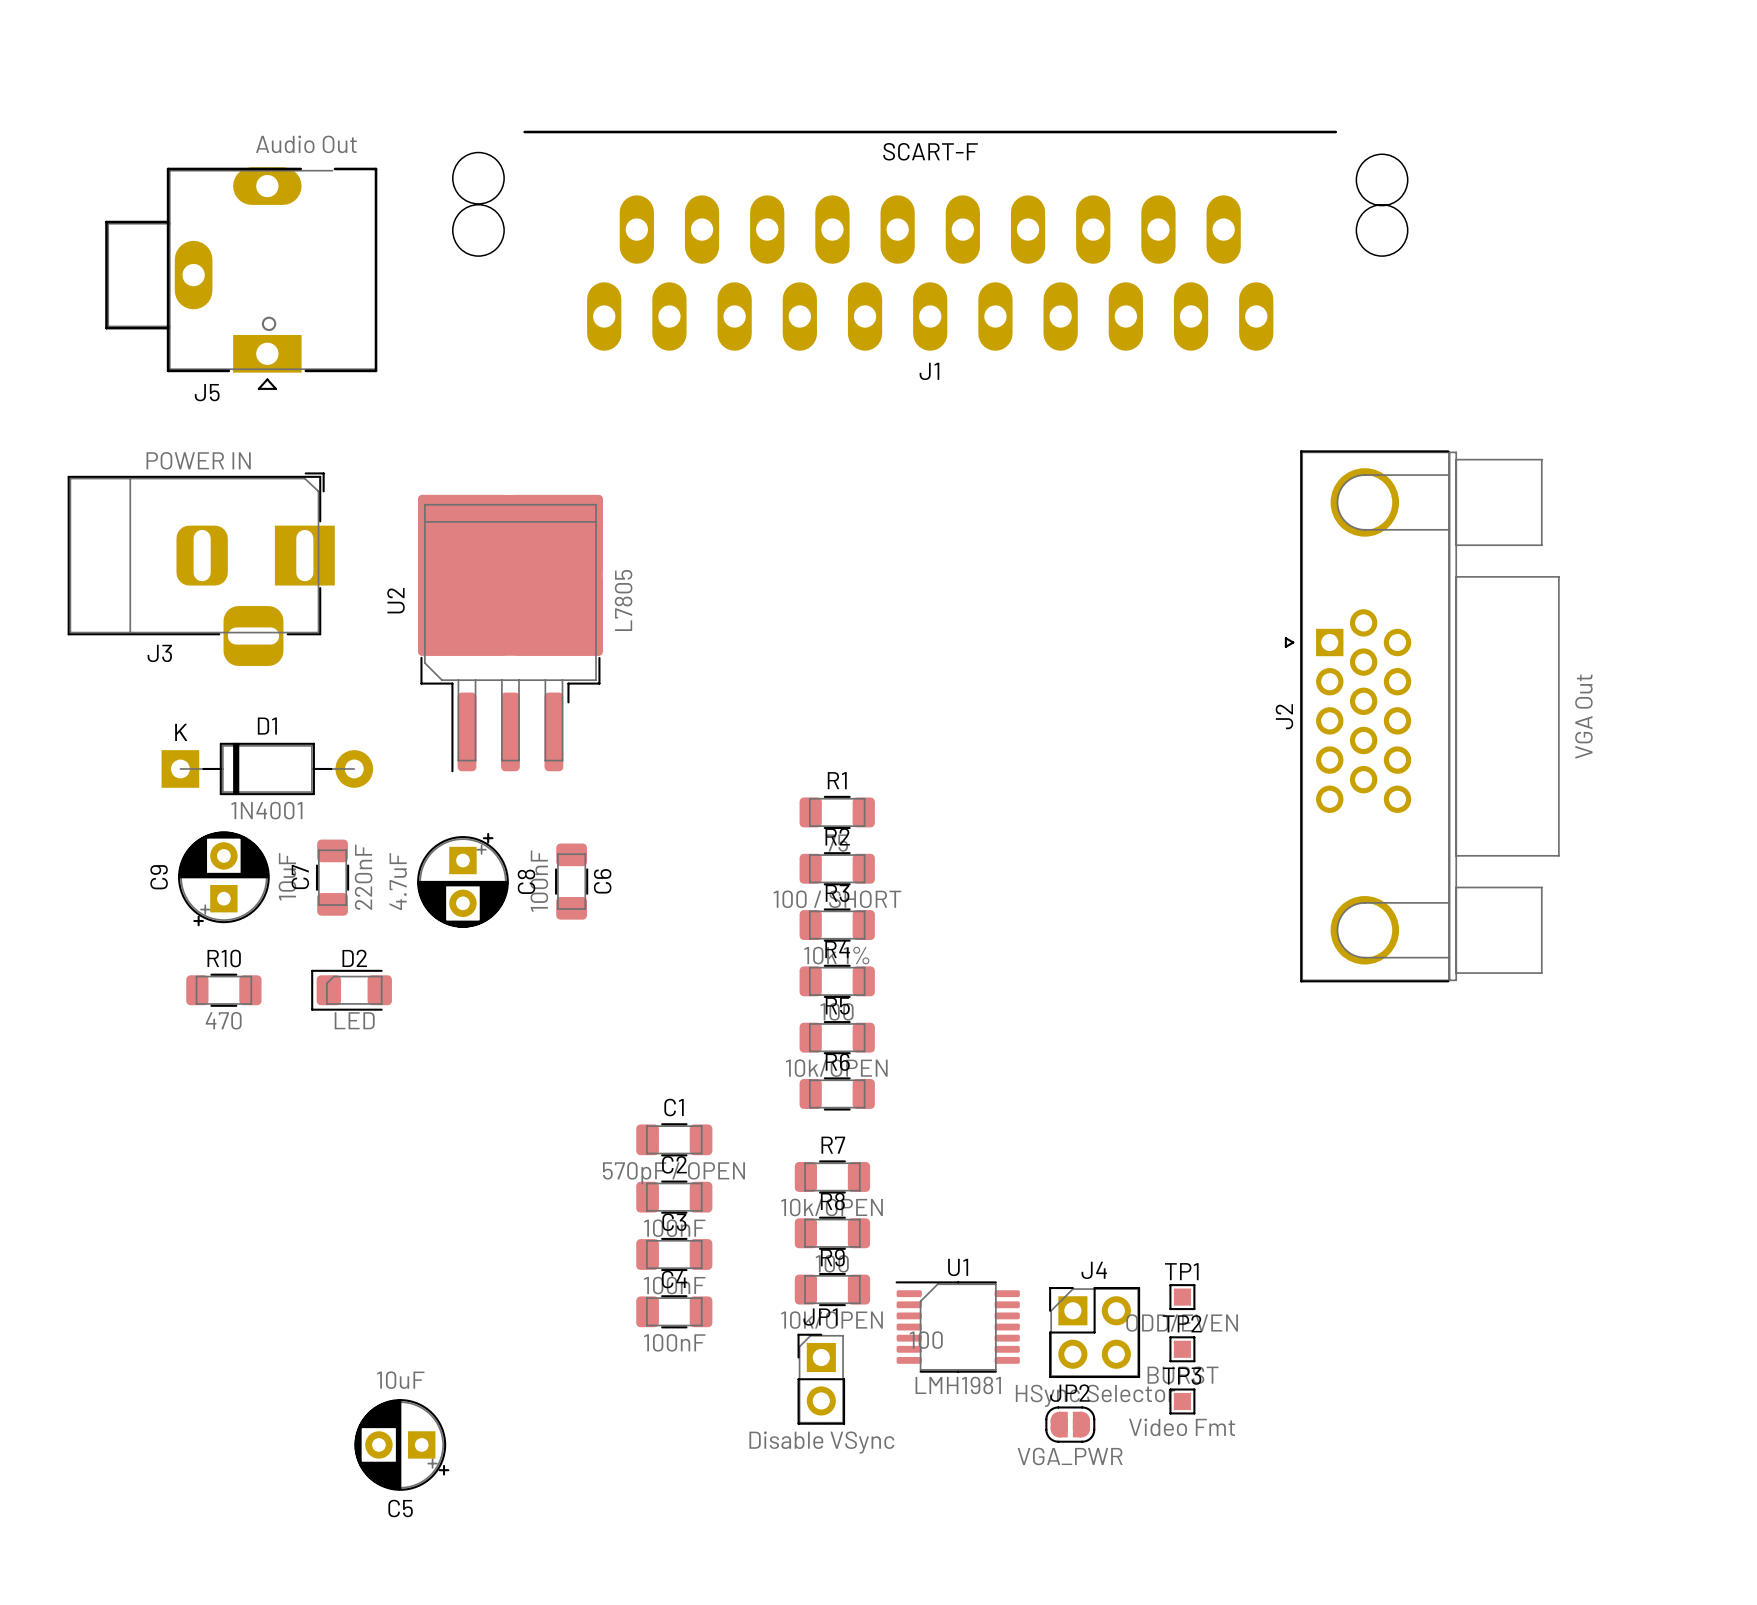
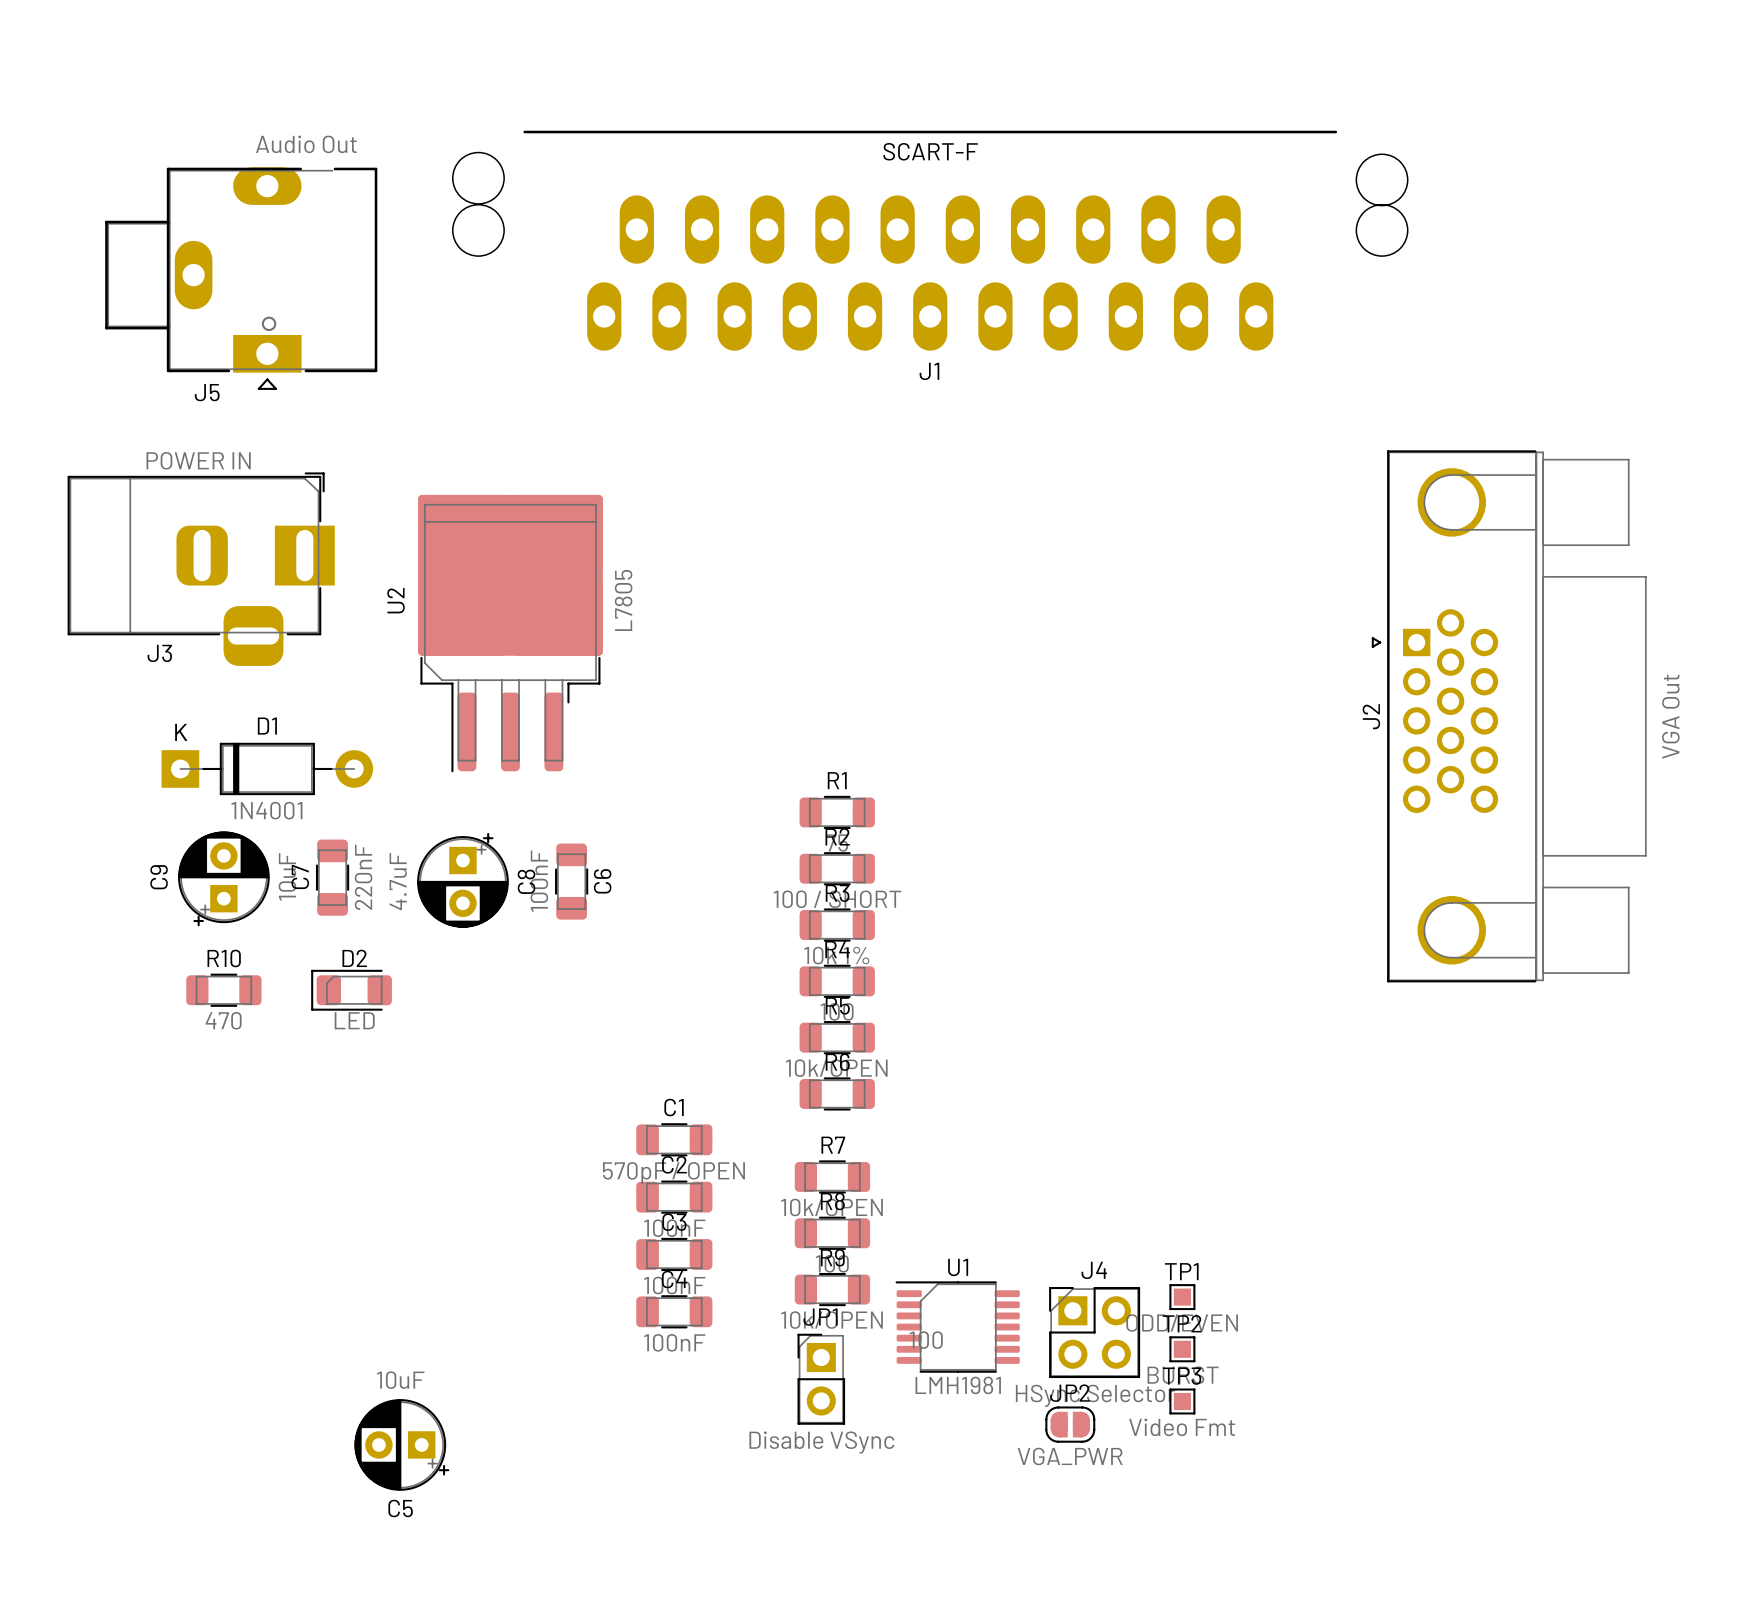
J2 position: (1422, 716) -> (1509, 716)

